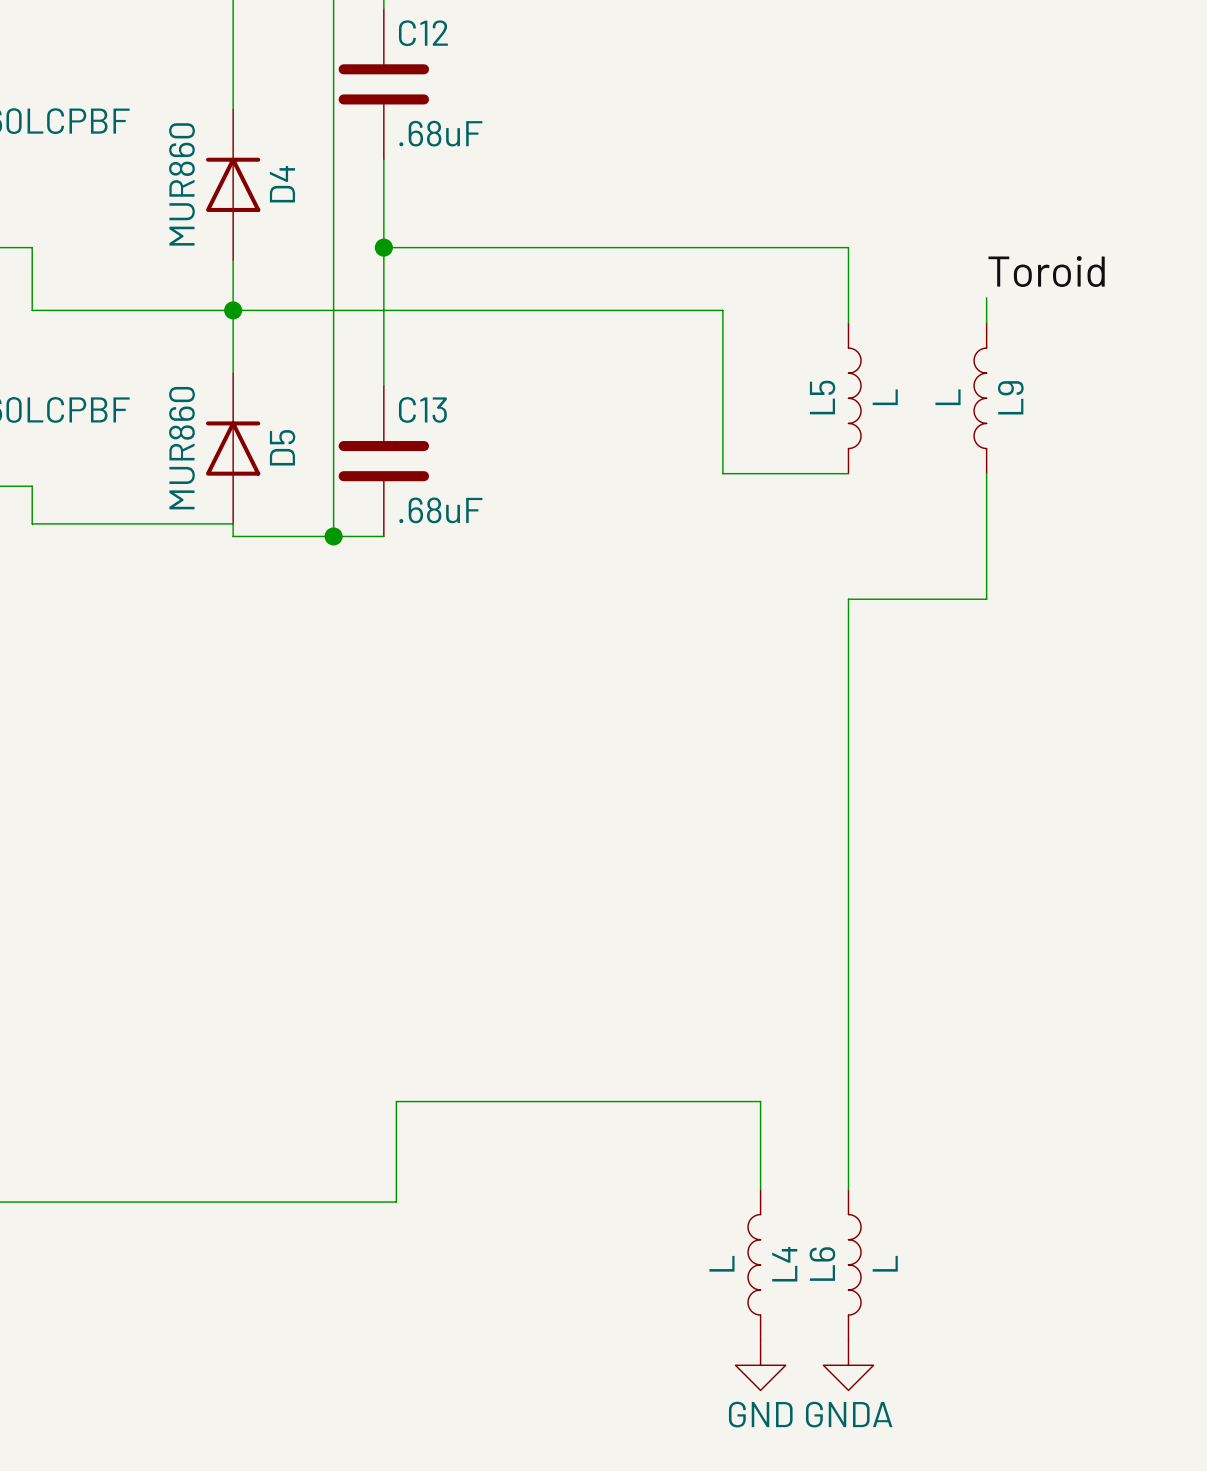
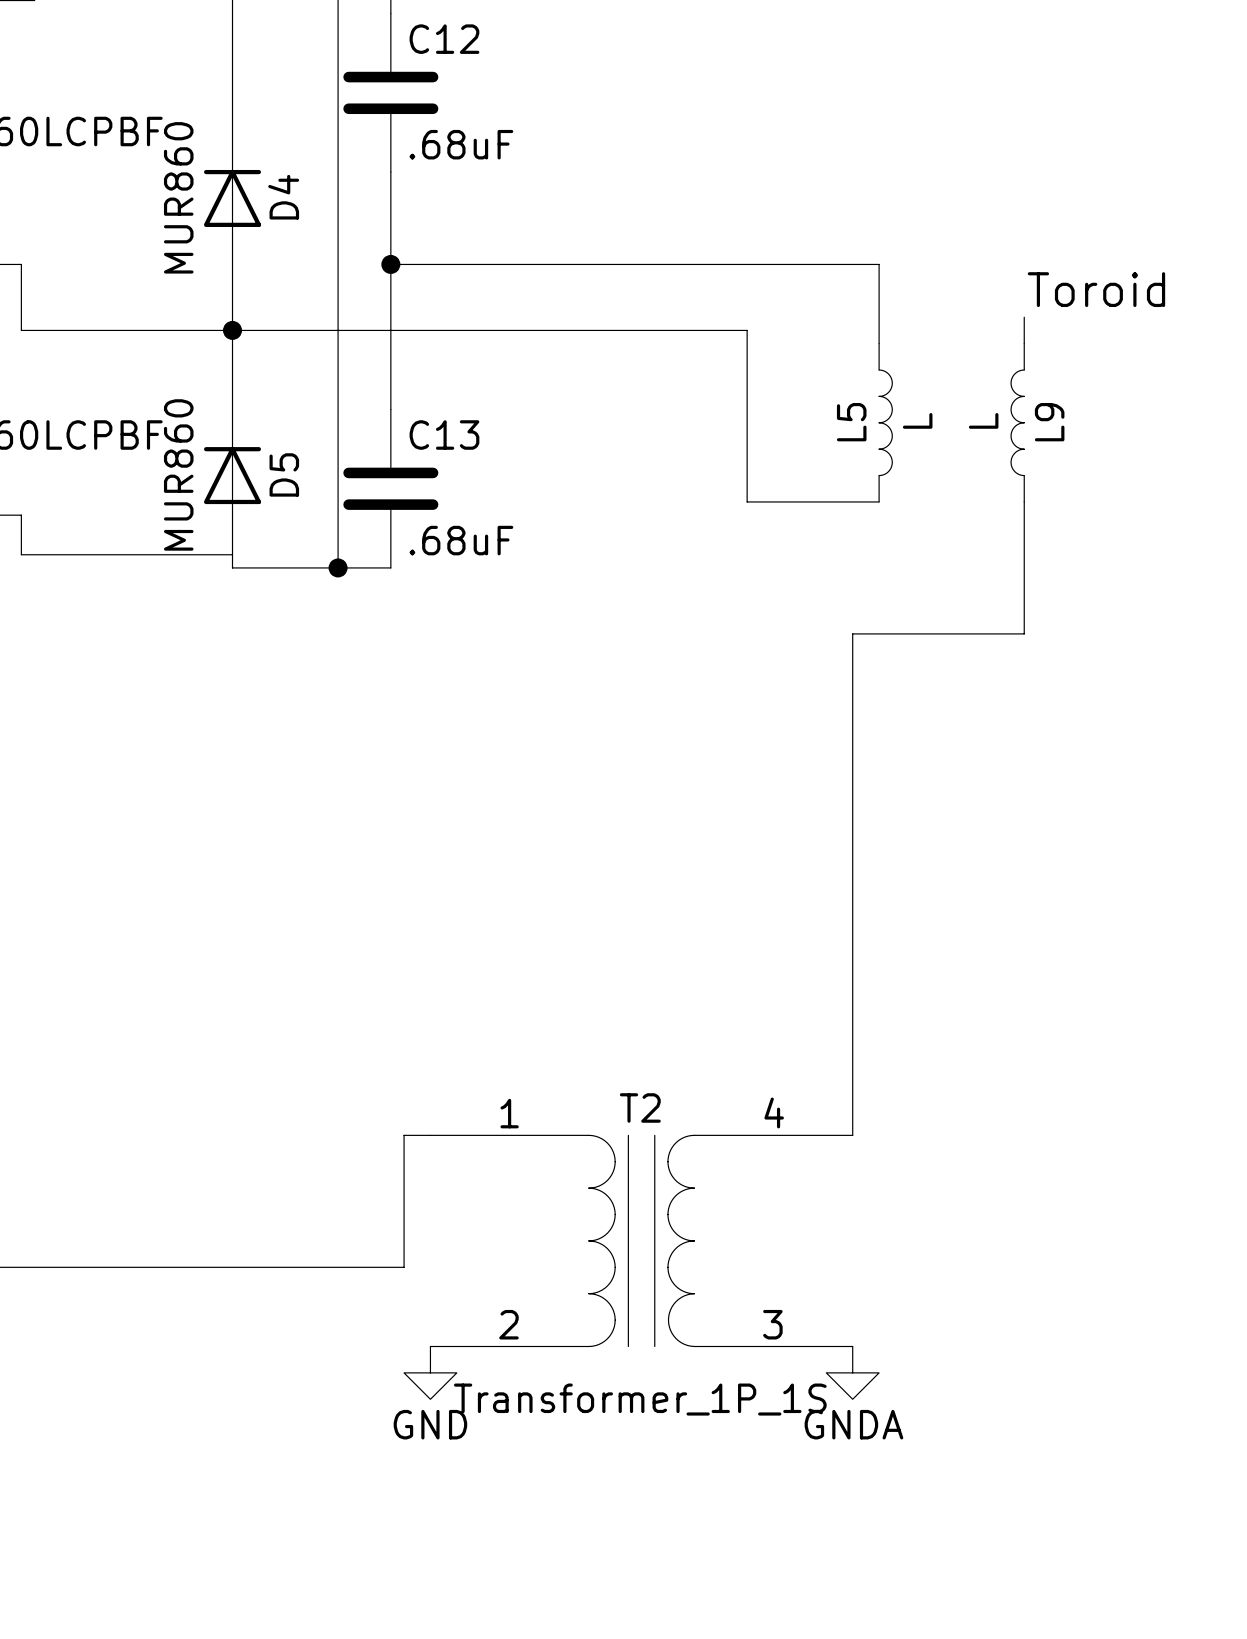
wire: (848, 599) (848, 1189) -> (879, 633) (852, 633) (852, 1135)
wire: (396, 1101) (760, 1101) (760, 1189) -> (404, 1161) (404, 1135) (430, 1135)
T2: none -> Transformer_1P_1S (641, 1240)
L4: L (754, 1264) -> none
L6: L (854, 1264) -> none
power symbol position: GND (760, 1365) -> GND (430, 1372)
power symbol position: GNDA (848, 1365) -> GNDA (852, 1372)

